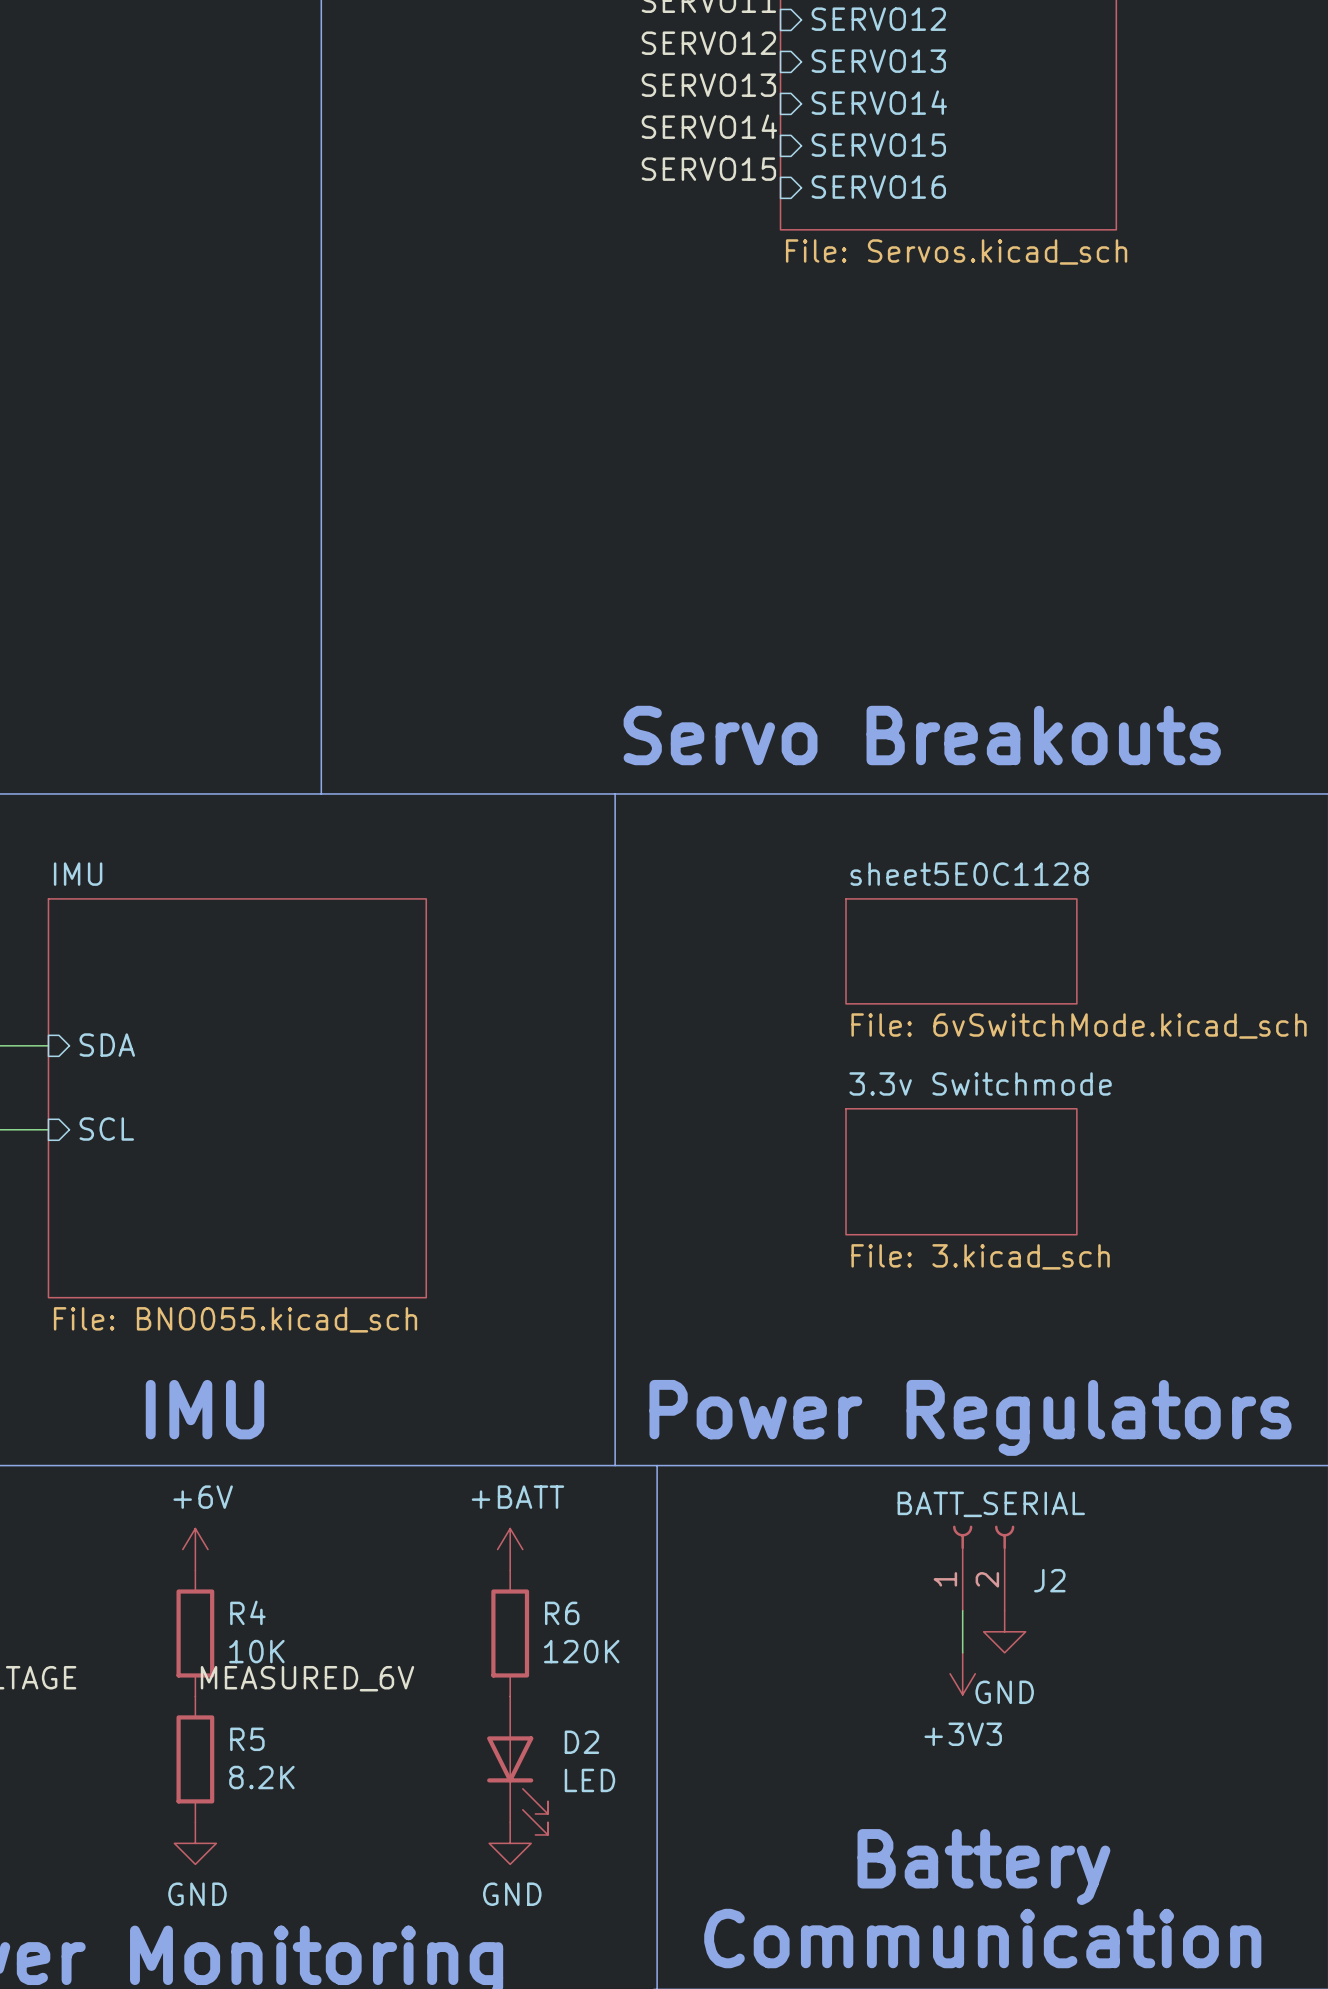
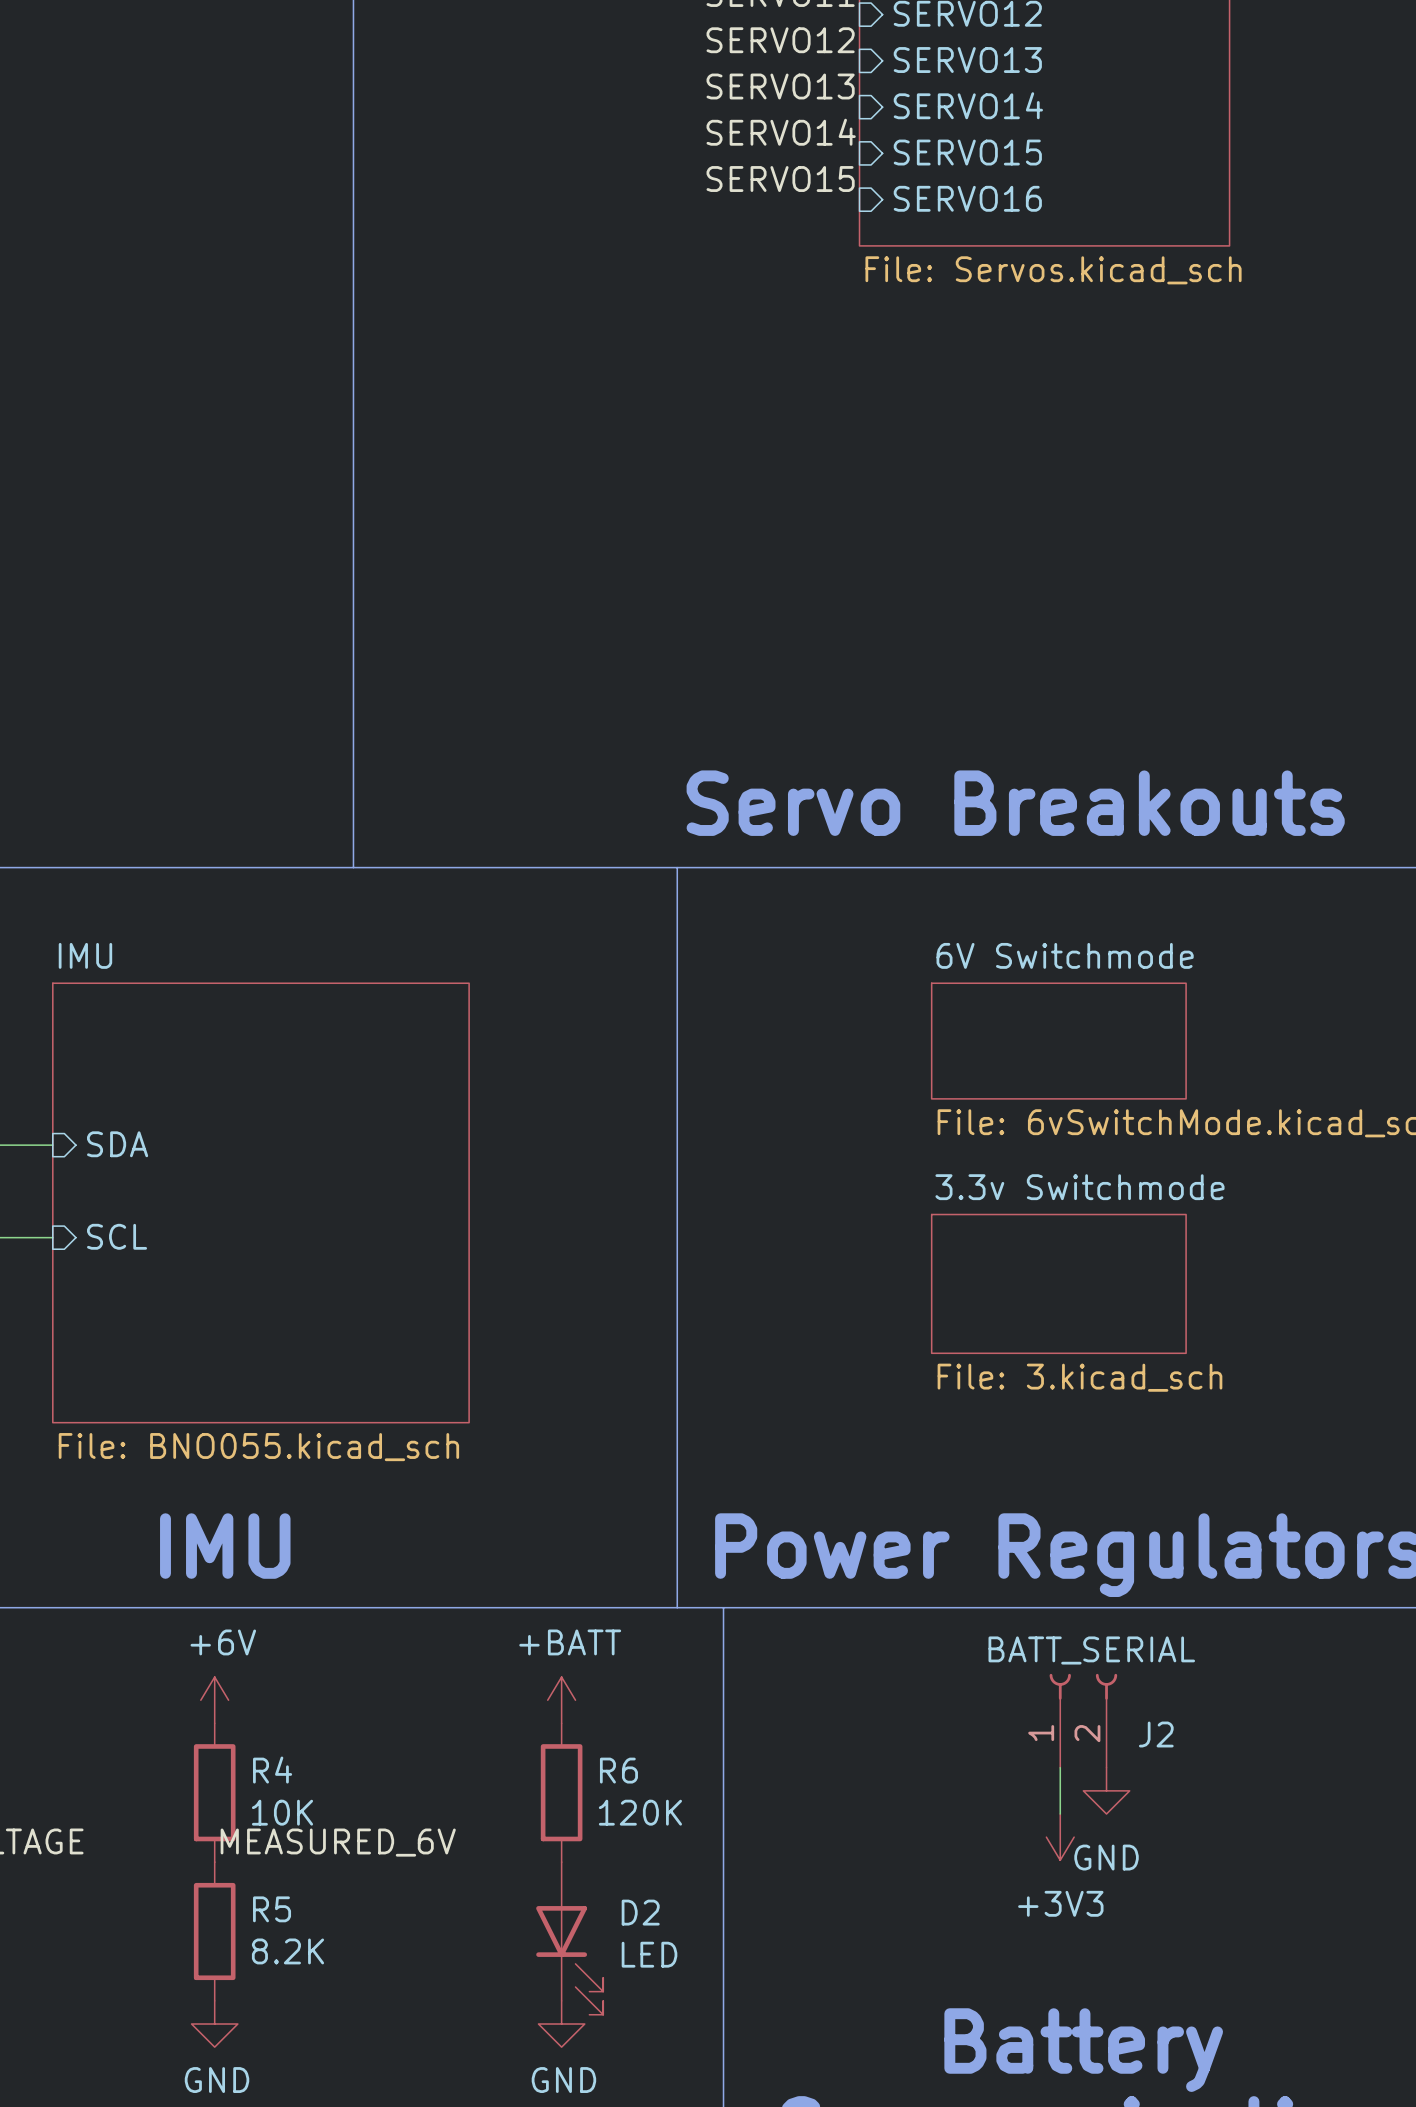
sheet sheet5E0C1128 name: sheet5E0C1128 (969, 874) -> 6V Switchmode (1065, 955)

